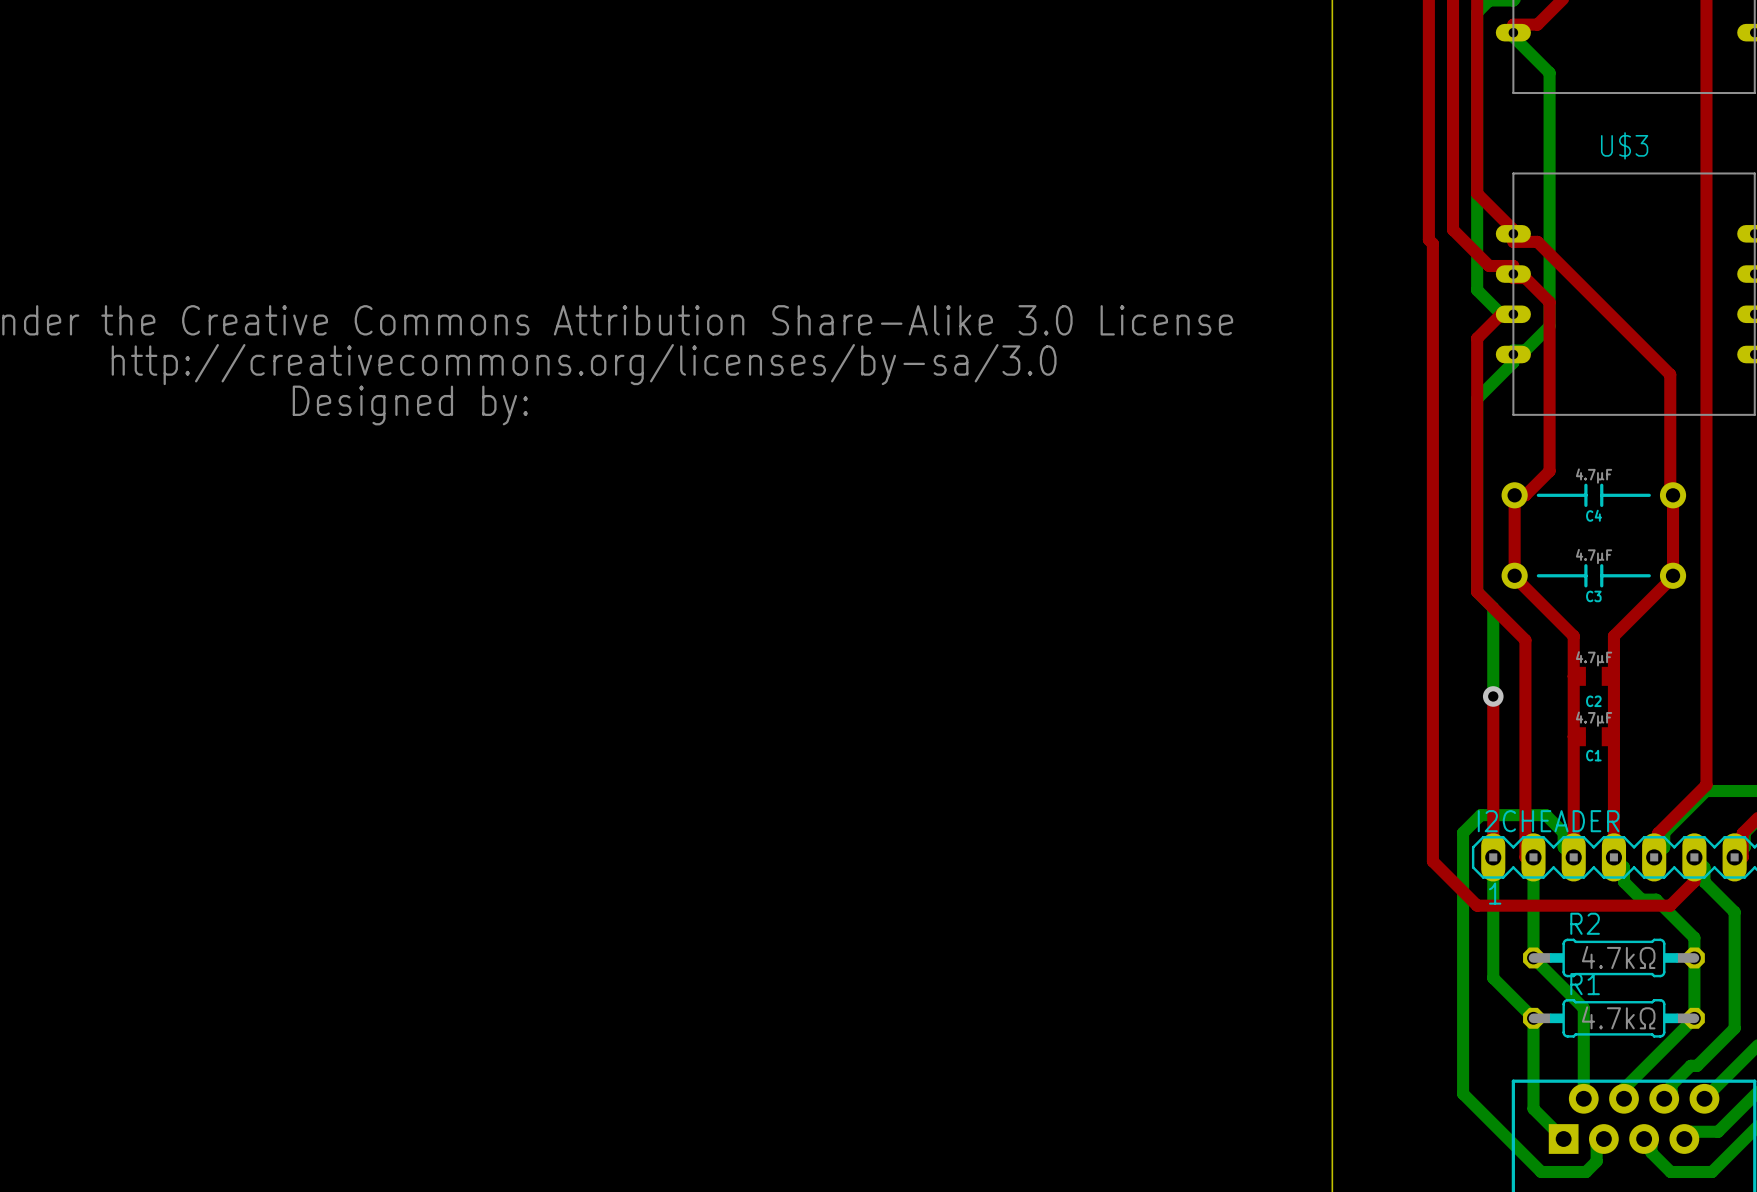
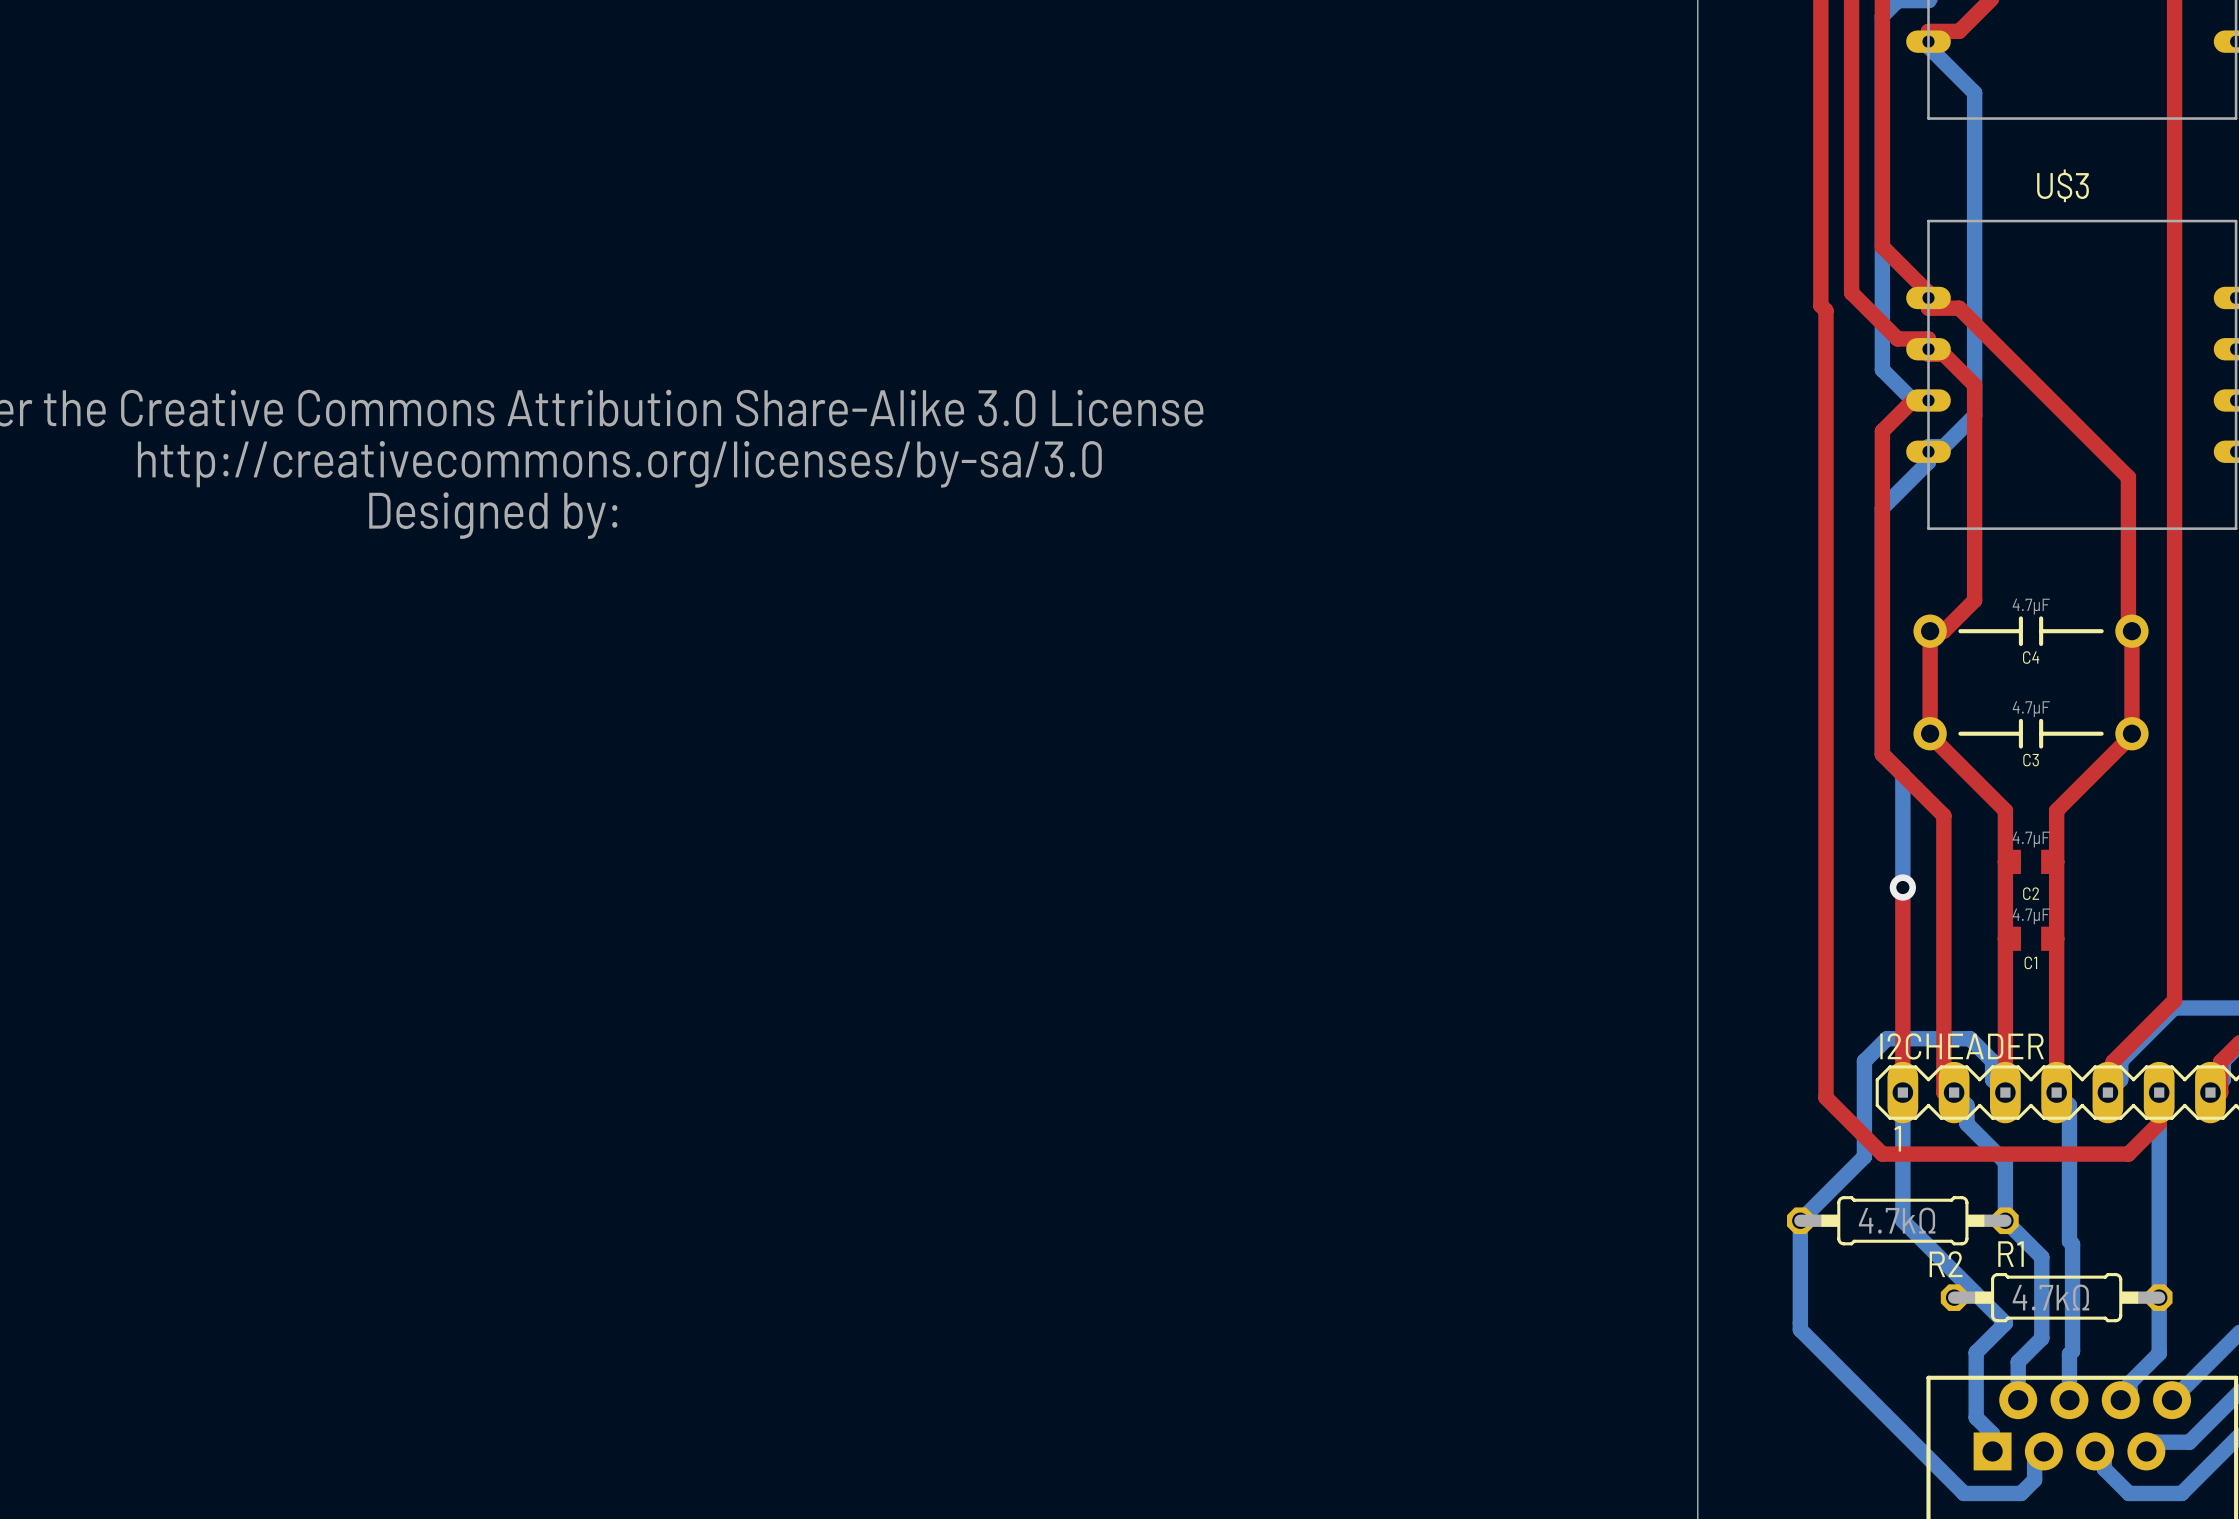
bottom track: (1533, 857) (1533, 957) (1583, 1008) (1583, 1068) -> (1954, 1092) (1966, 1105) (1966, 1123) (2005, 1162) (2005, 1220) (2041, 1257) (2041, 1338) (2018, 1361)
bottom track: (1694, 857) (1704, 867) (1704, 881) (1734, 912) (1734, 1028) (1697, 1065) (1690, 1065) -> none
bottom track: (1624, 881) (1641, 899) (1656, 899) (1694, 937) -> (2159, 1092) (2159, 1195)
bottom track: none -> (2069, 1123) (2069, 1241) (2072, 1244) (2072, 1351) (2069, 1354) (2069, 1387)
bottom track: (1463, 907) (1463, 1093) -> (1864, 1156) (1800, 1220) (1800, 1329) (1864, 1393)
R2 name position: R2 (1585, 923) -> R2 (1946, 1264)
bottom track: (1493, 957) (1493, 978) (1533, 1018) (1533, 1108) (1563, 1139) -> (1902, 1220) (2005, 1323) (1976, 1352) (1976, 1417) (1992, 1433) (1992, 1451)
R2 position: (1613, 957) -> (1902, 1220)
bottom track: (1694, 1018) (1624, 1088) -> (2159, 1297) (2159, 1353) (2154, 1358)

